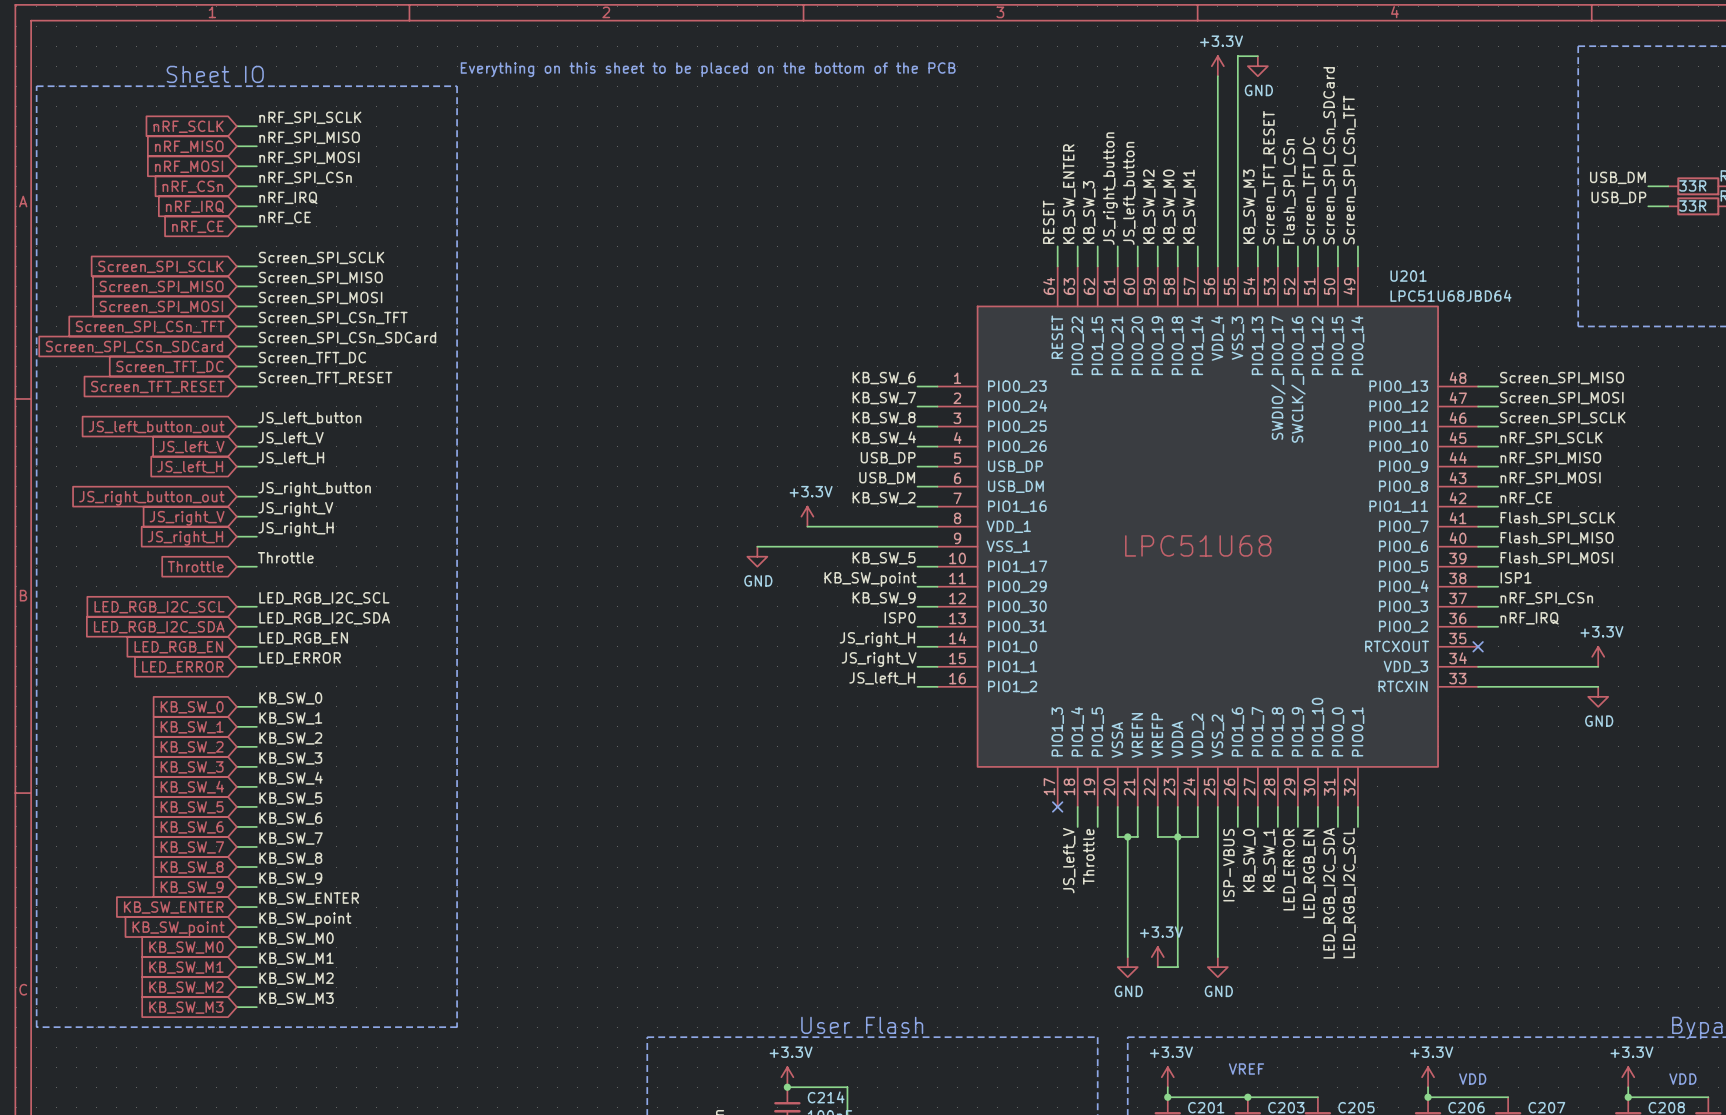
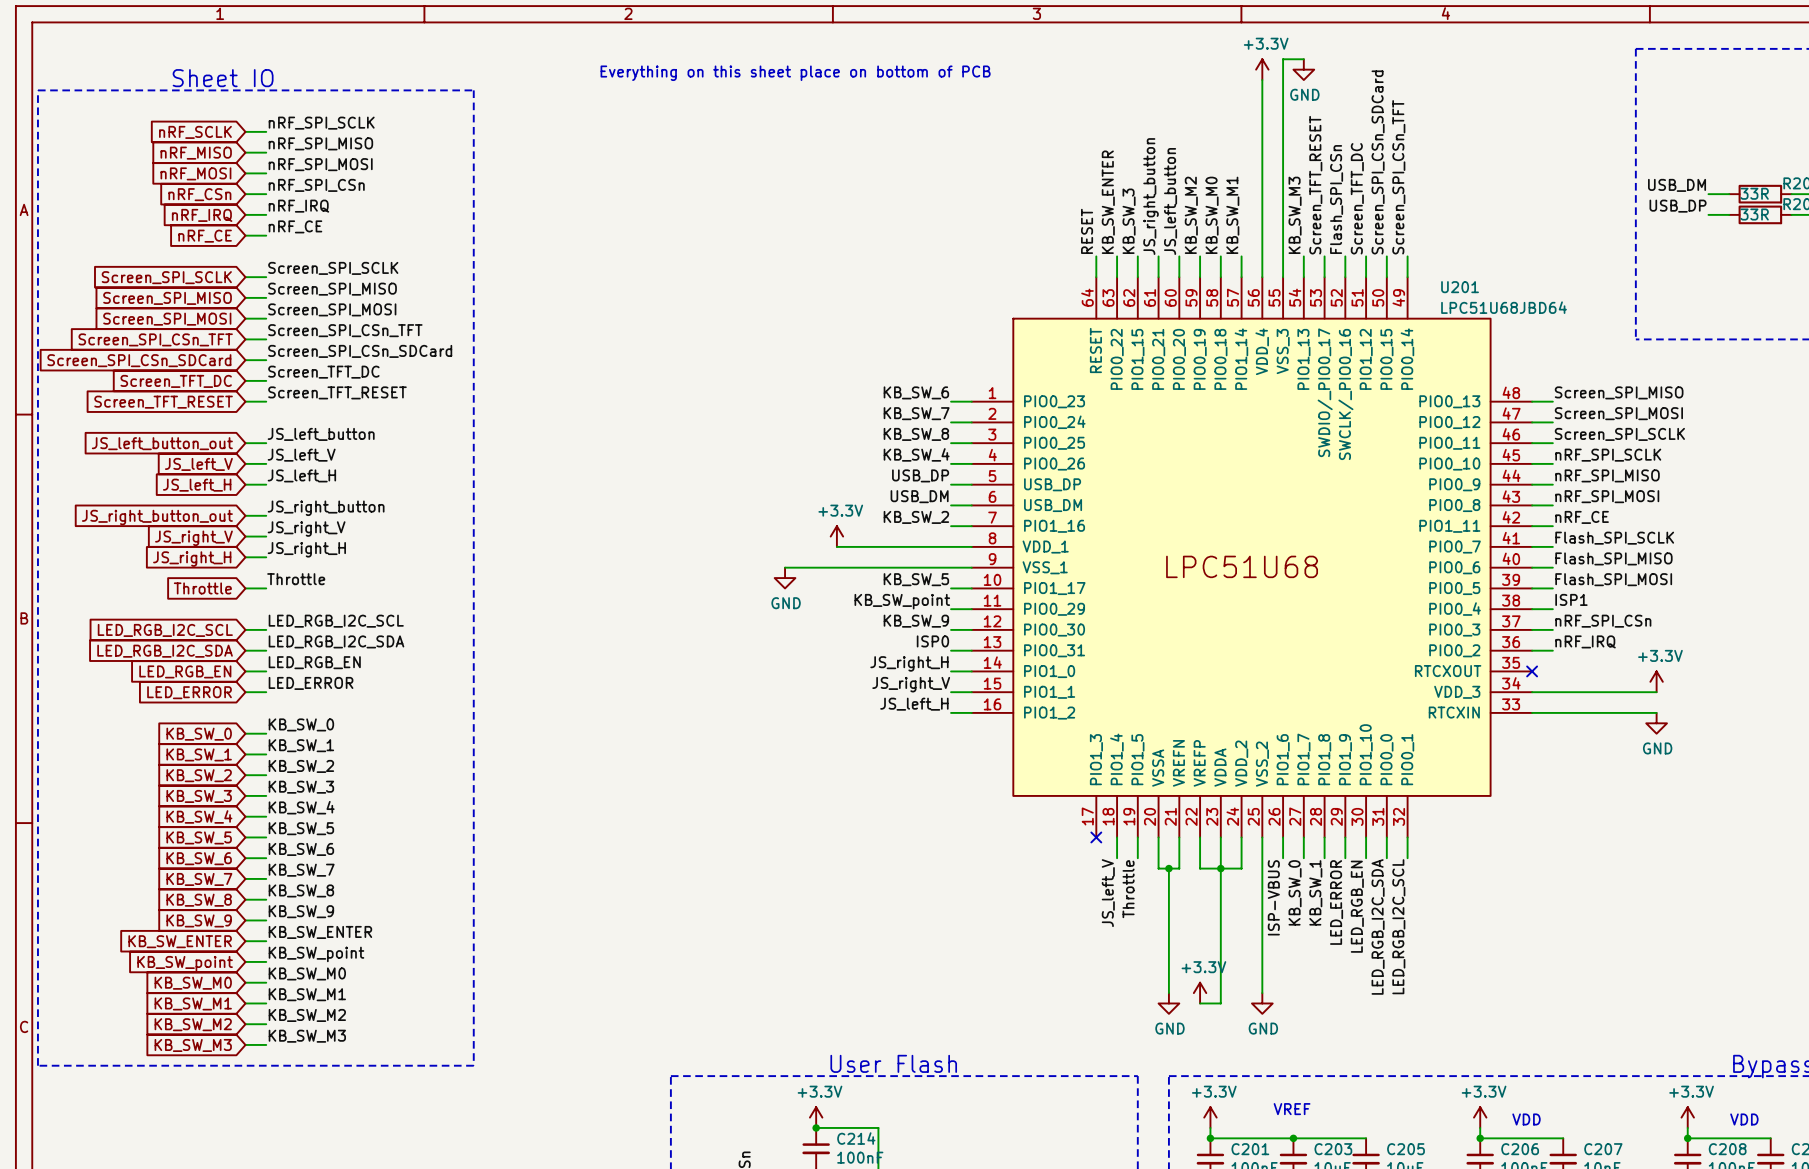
text: Everything on this sheet to be placed on the bottom of the PCB (708, 69) -> Everything on this sheet place on bottom of PCB (795, 73)

